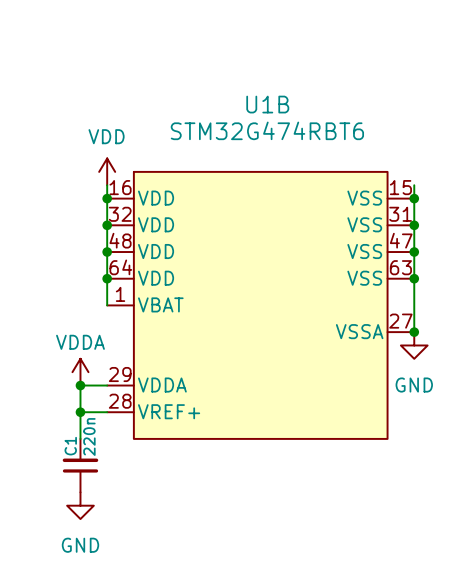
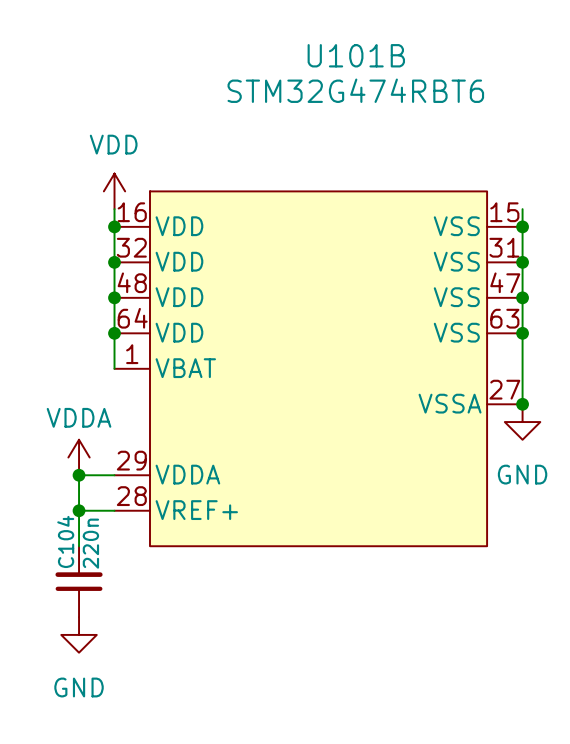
U1B name: U1B (267, 104) -> U101B (356, 55)
U1B value position: STM32G474RBT6 (267, 130) -> STM32G474RBT6 (355, 90)
C1 name: C1 (70, 446) -> C104 (65, 541)

